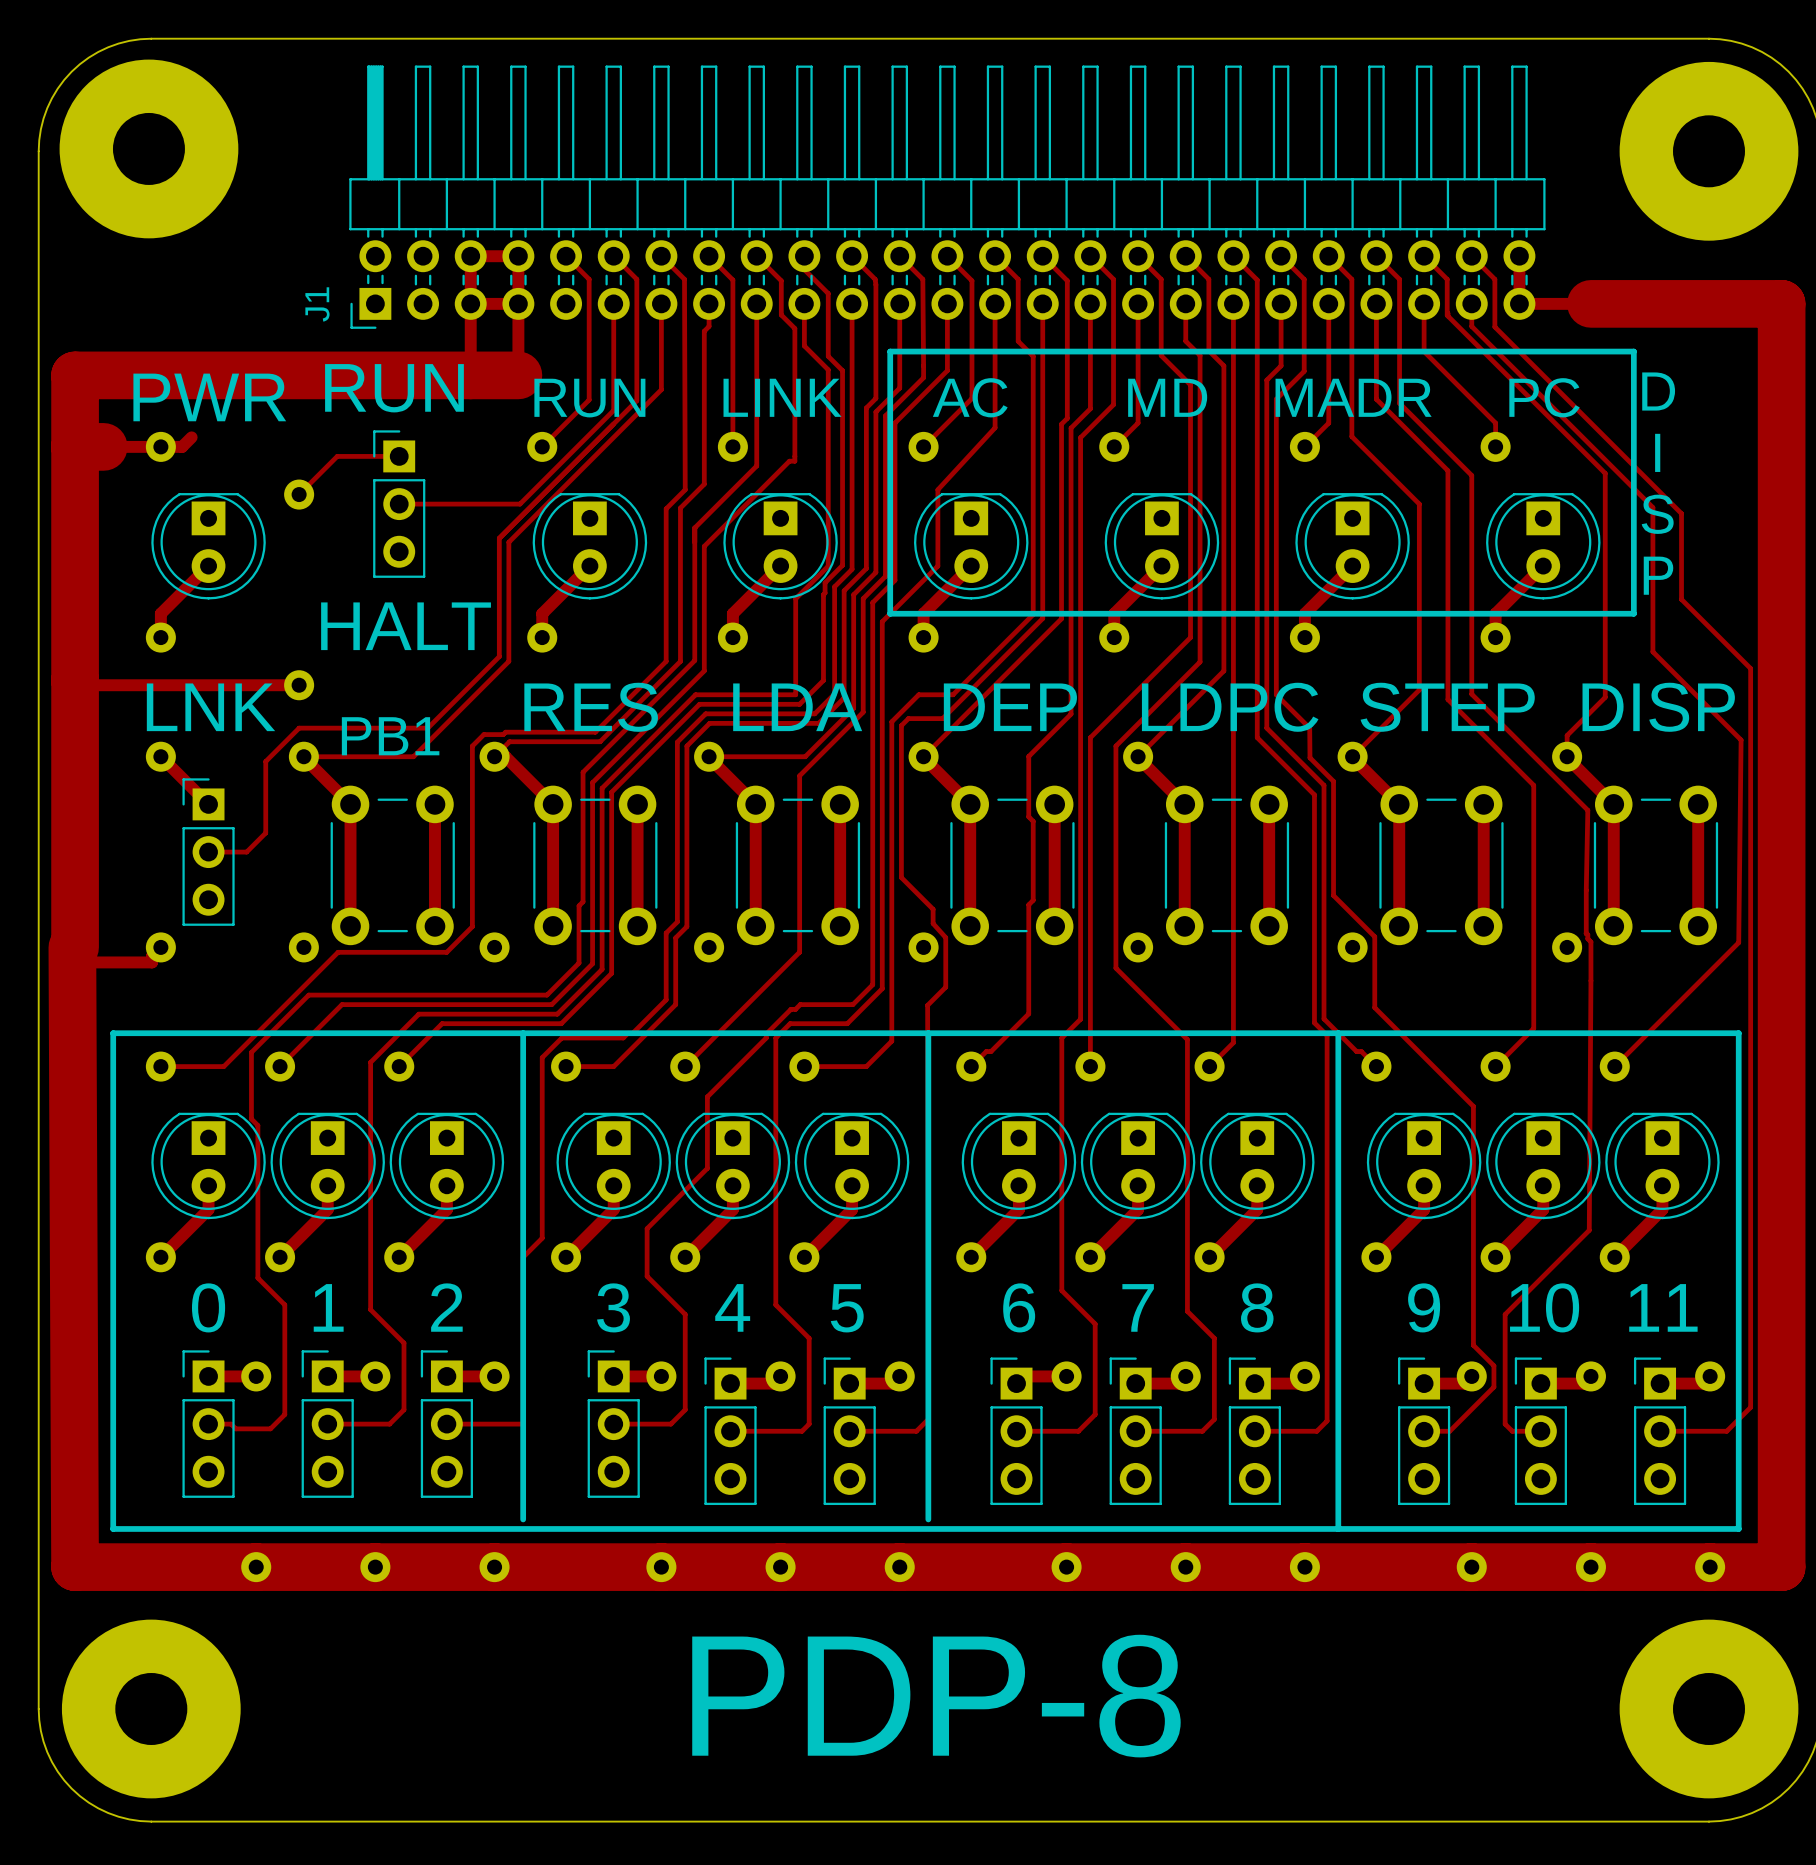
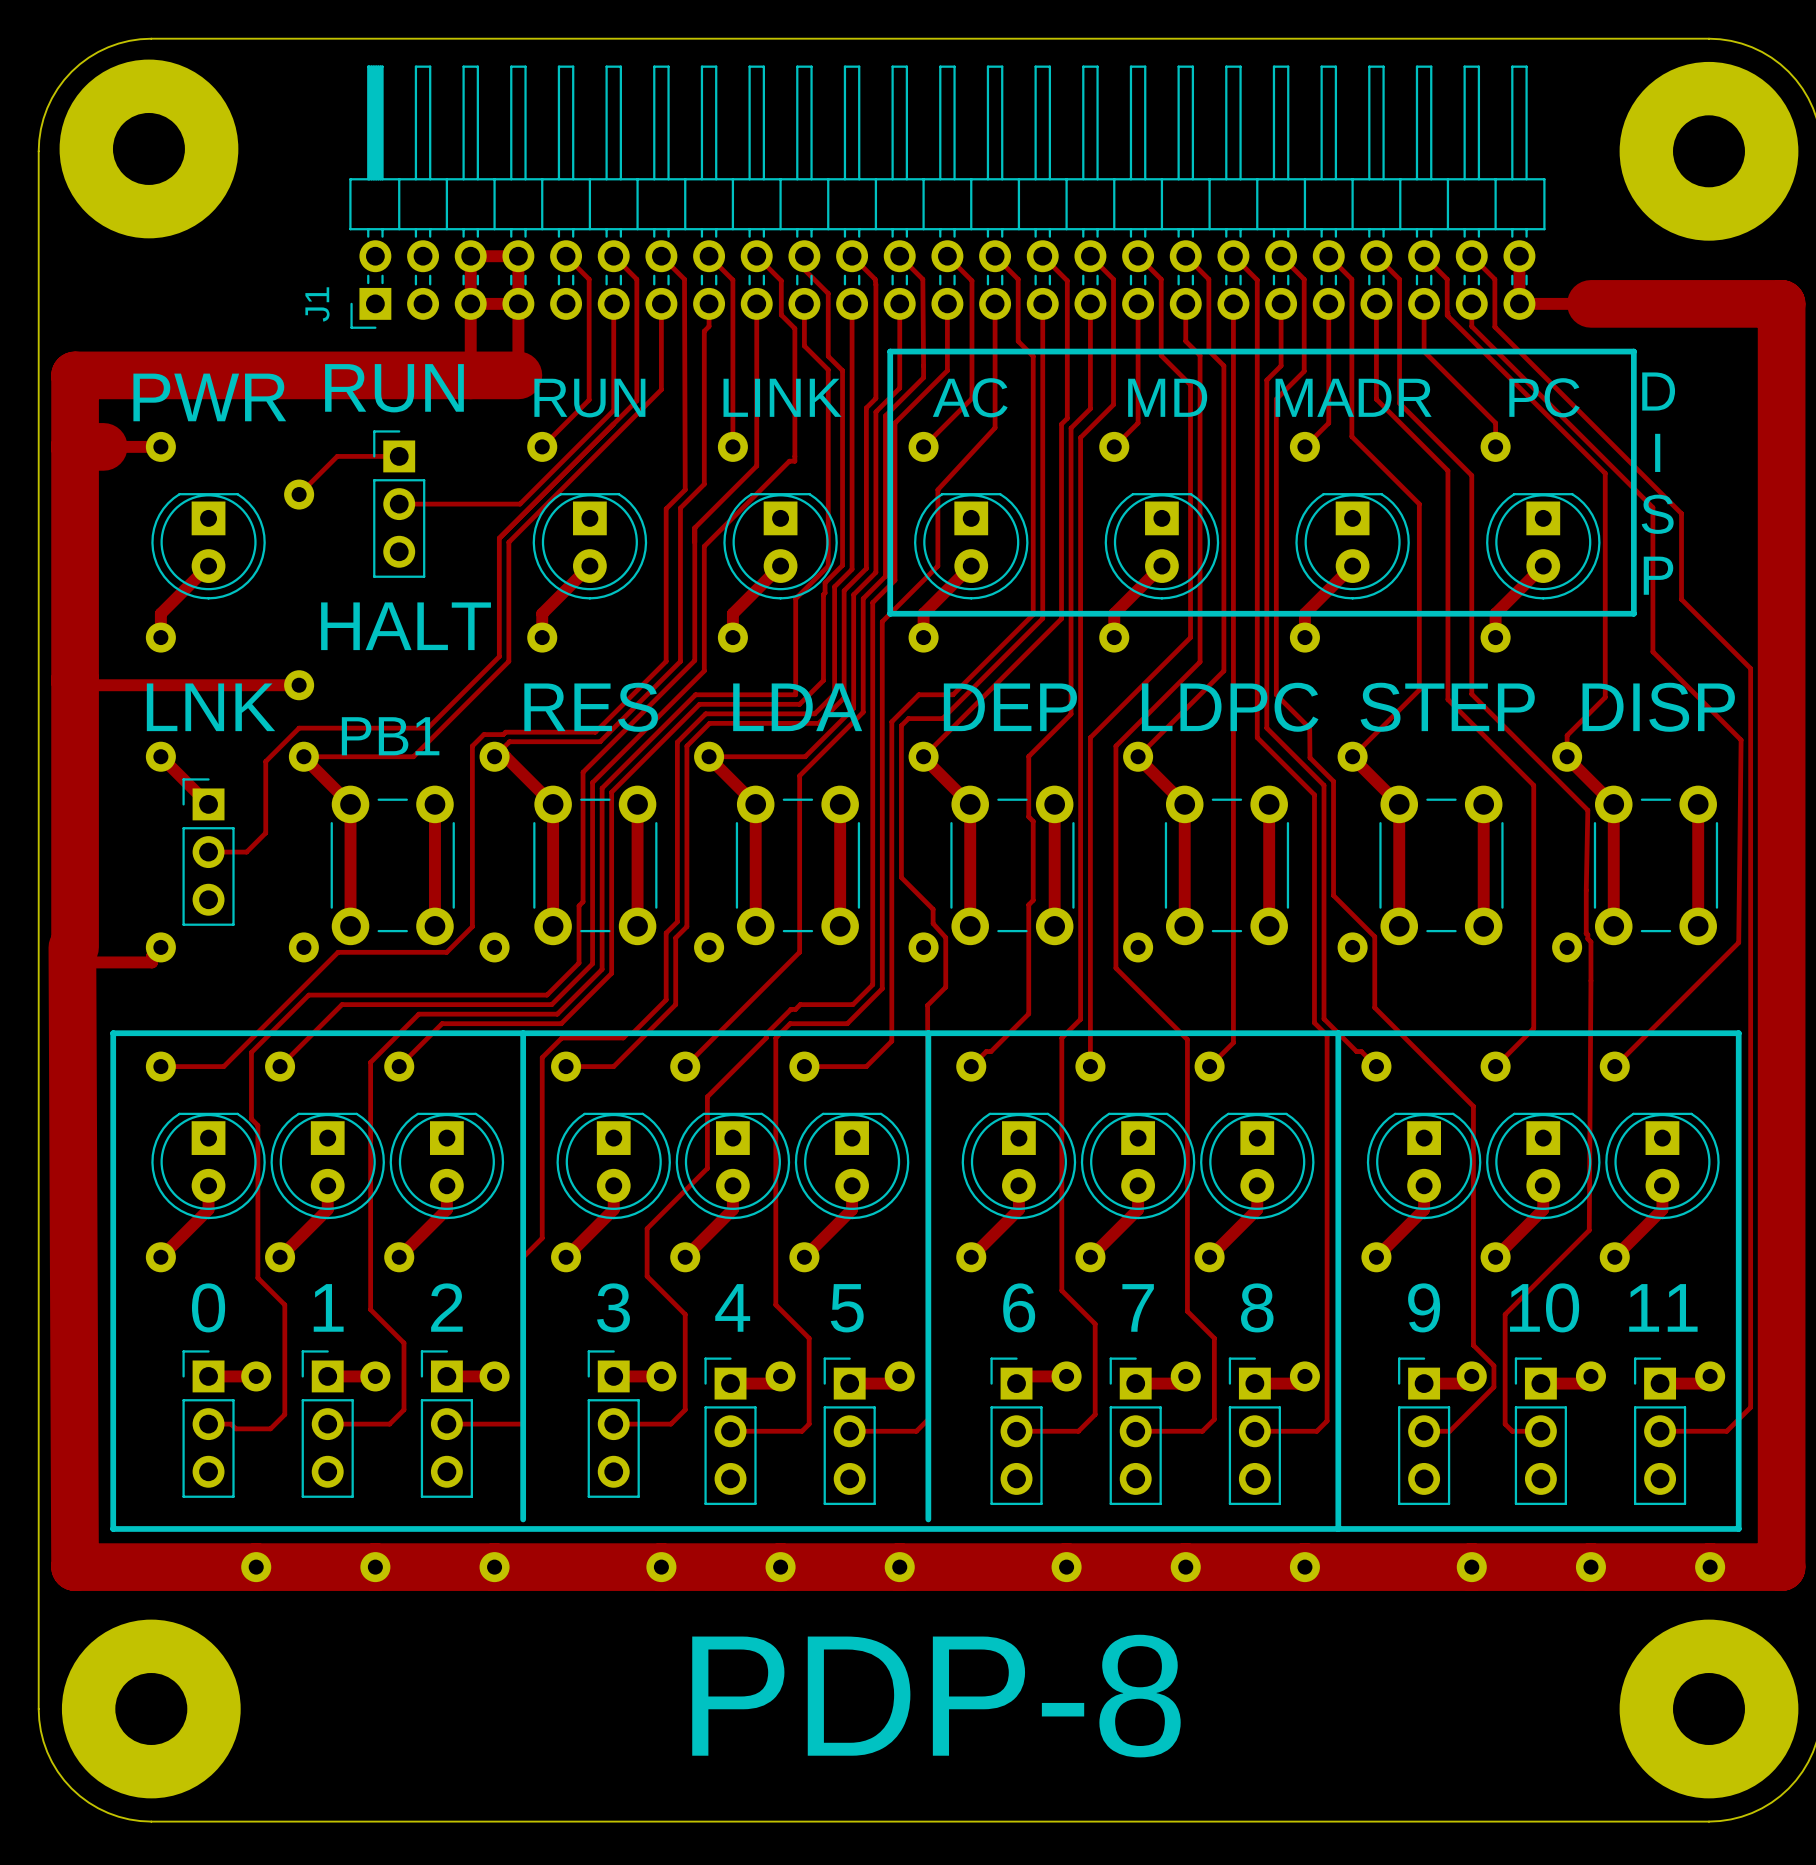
track: (191, 437) (182, 446) (160, 446) -> none

